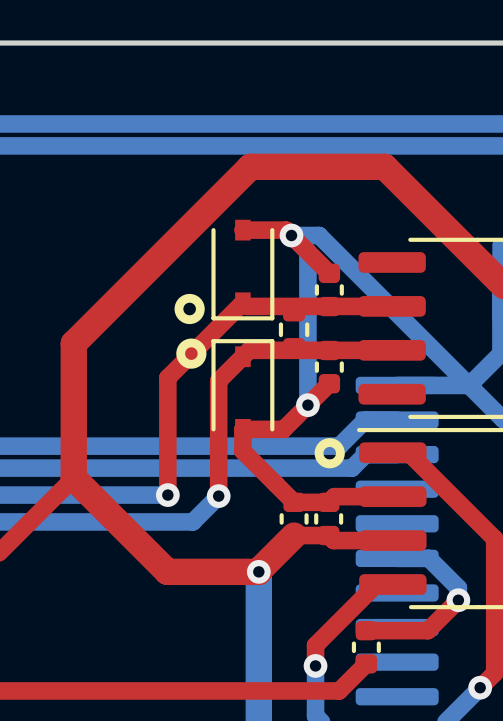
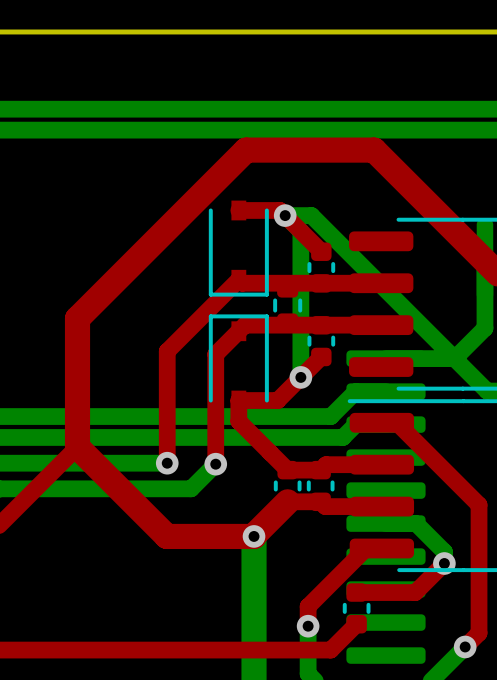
drawing: [174, 293, 207, 369] -> none
drawing: [314, 438, 345, 469] -> none

